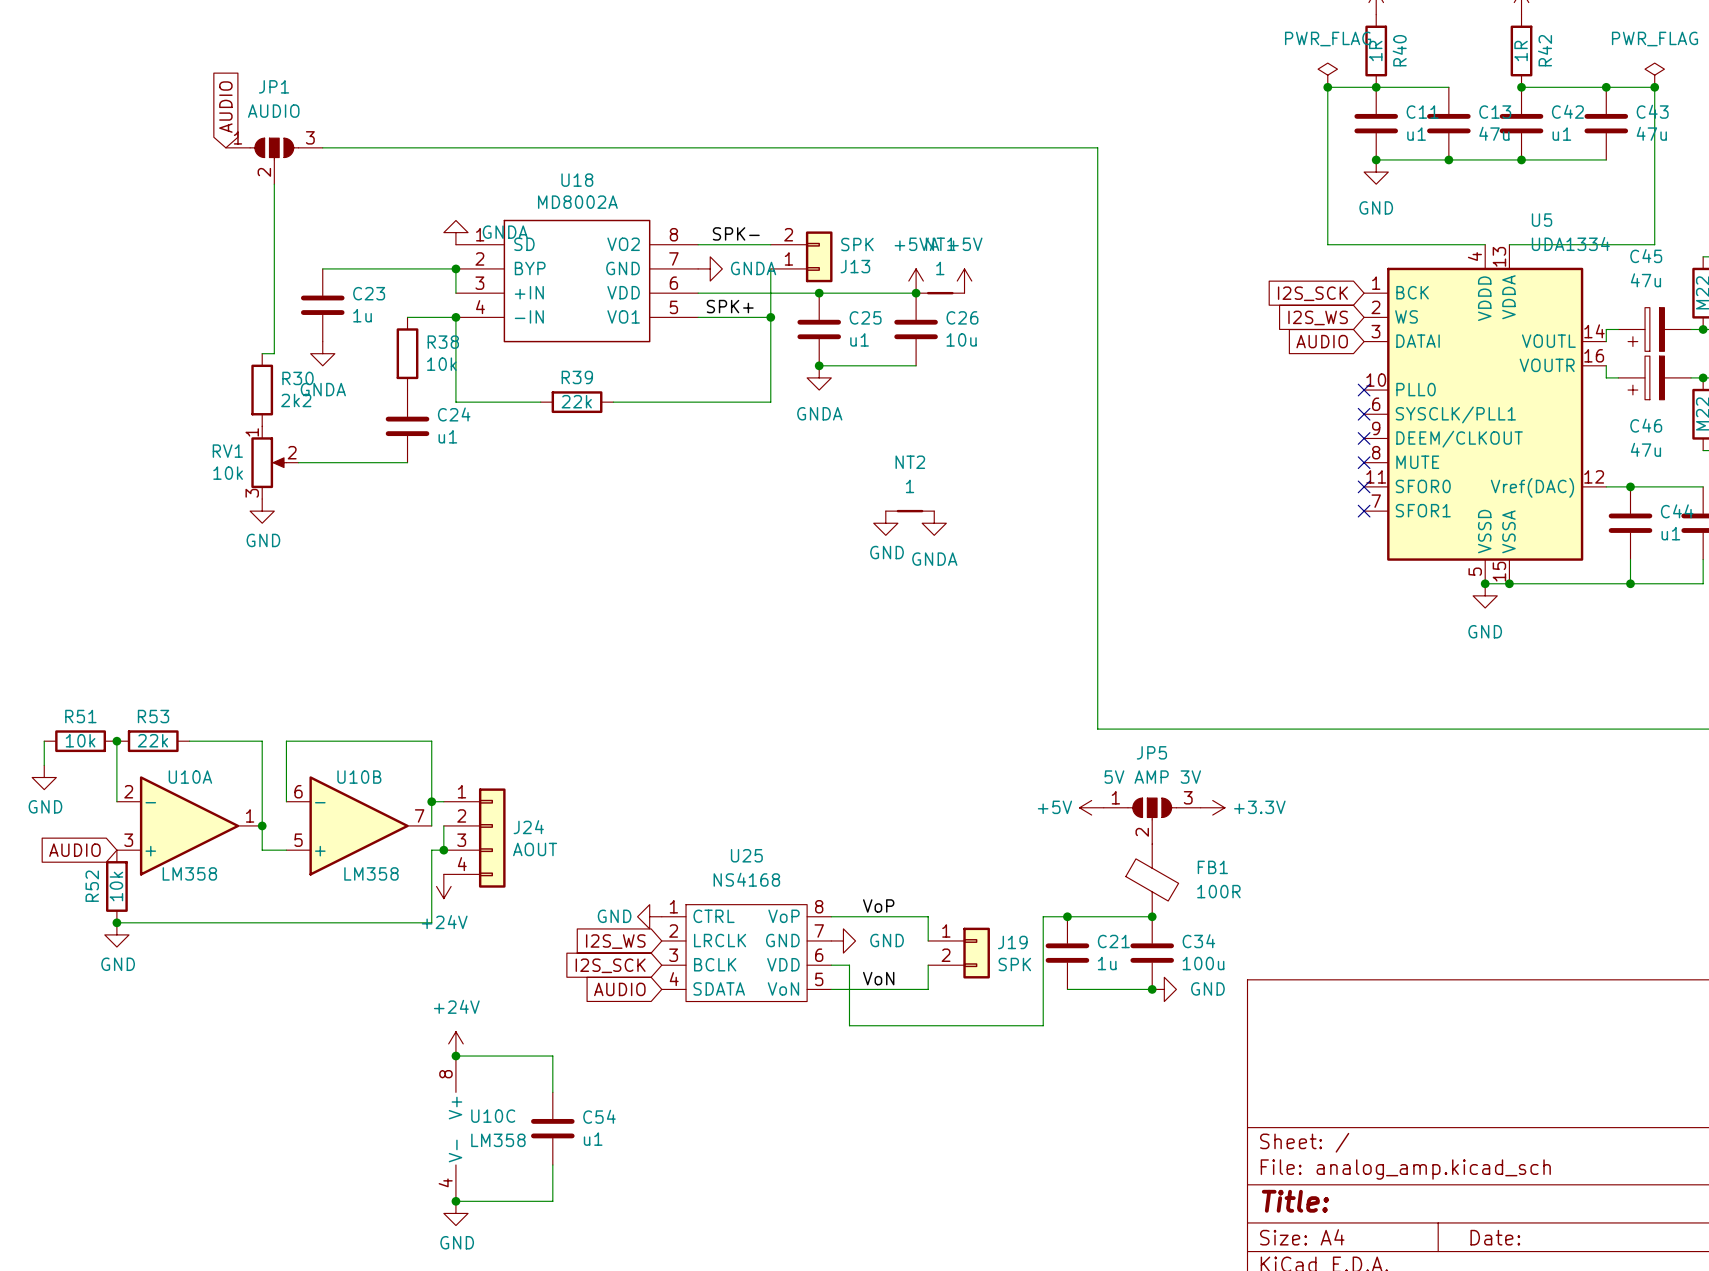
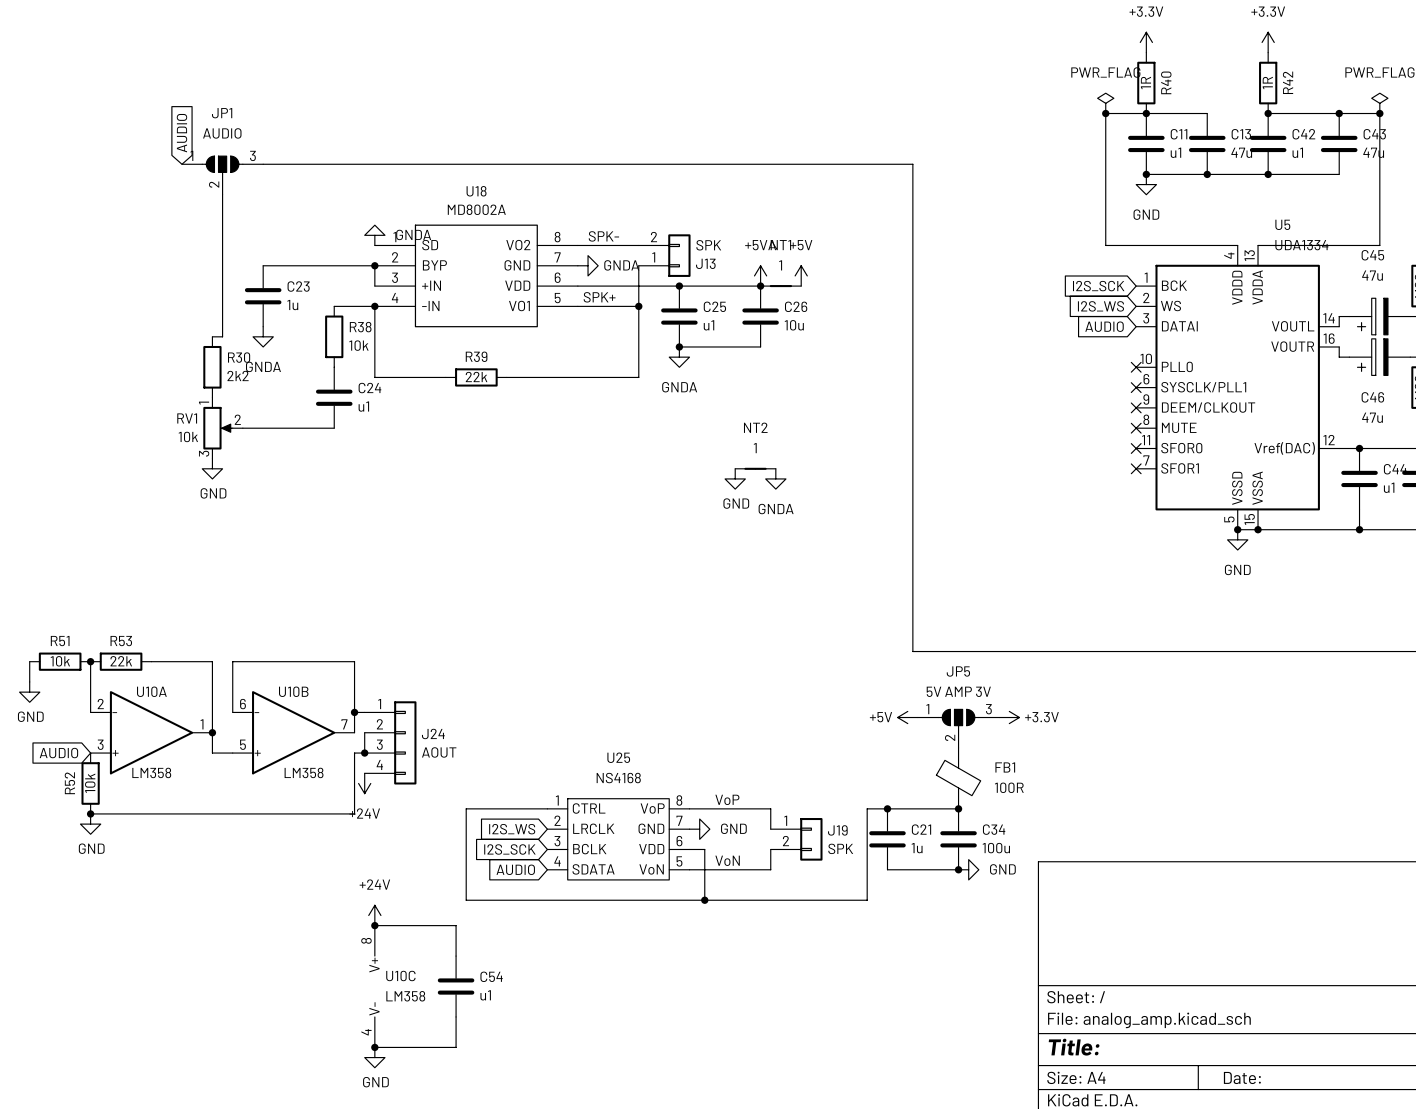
power symbol: GND (649, 916) -> none
wire: none -> (547, 808) (466, 808) (466, 900) (704, 900)
junction: none -> (704, 900)

